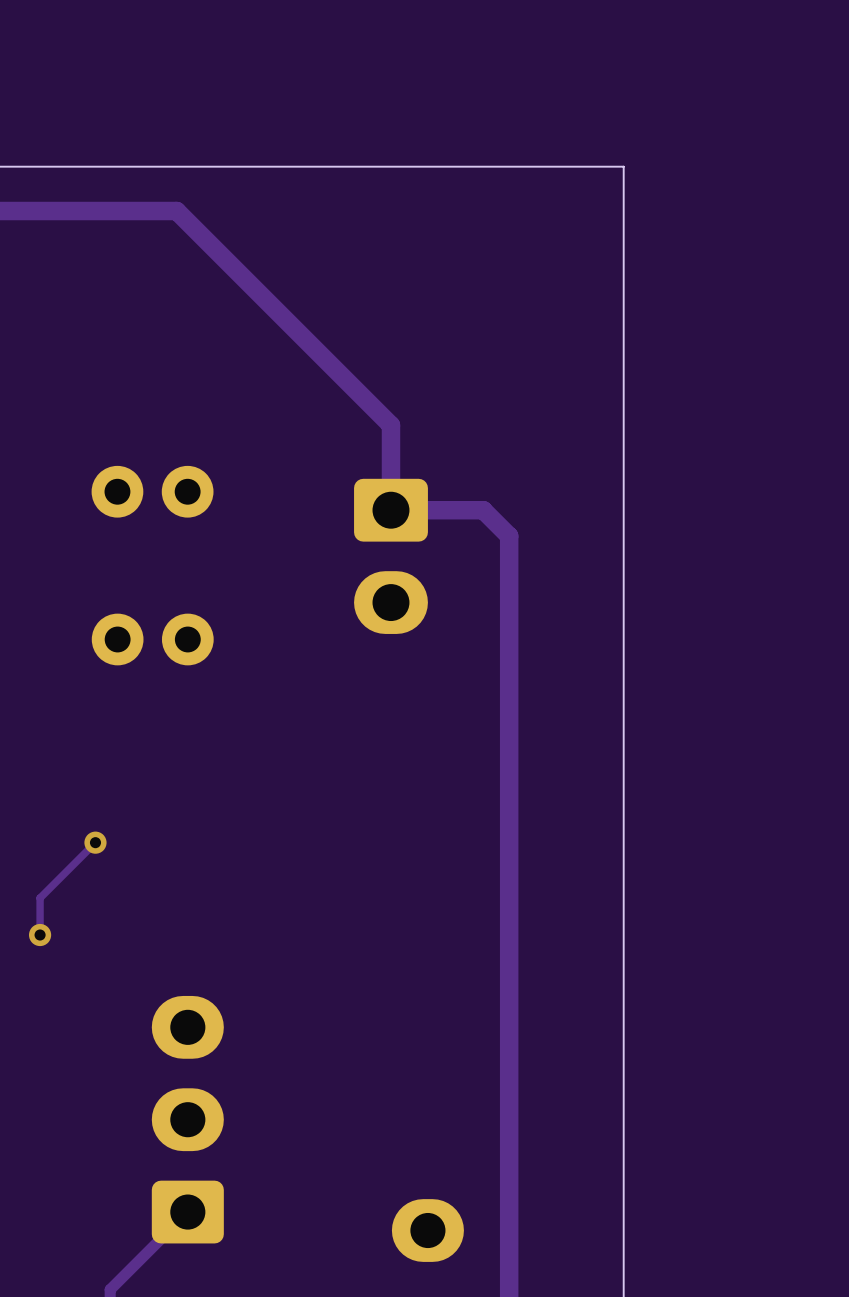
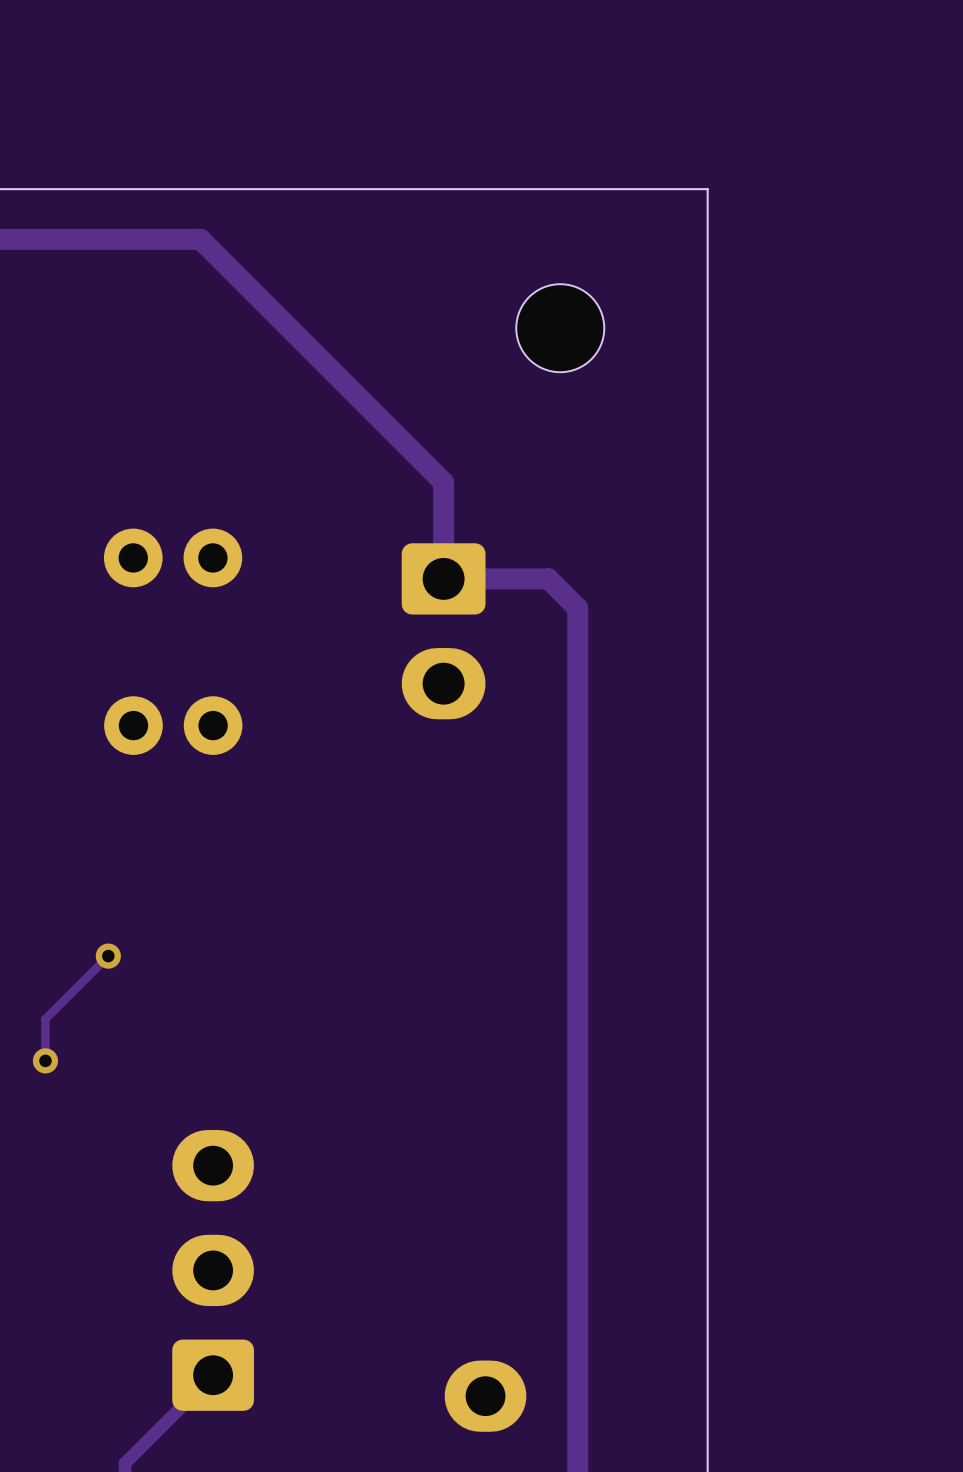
part: none -> (560, 328)

